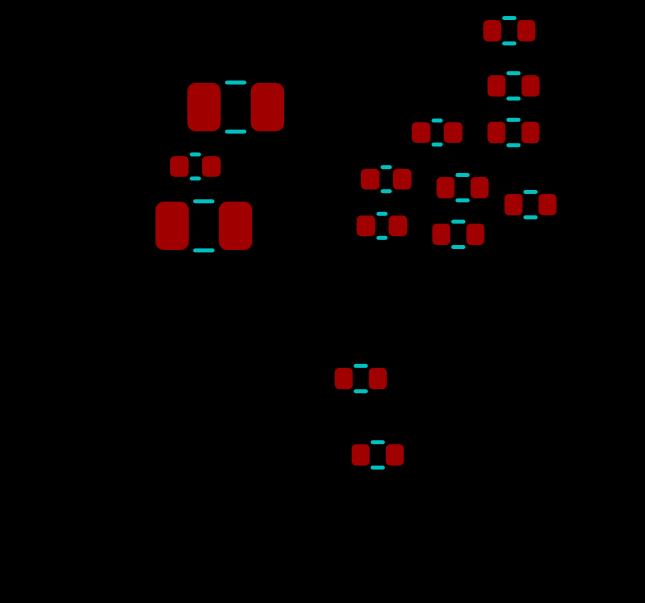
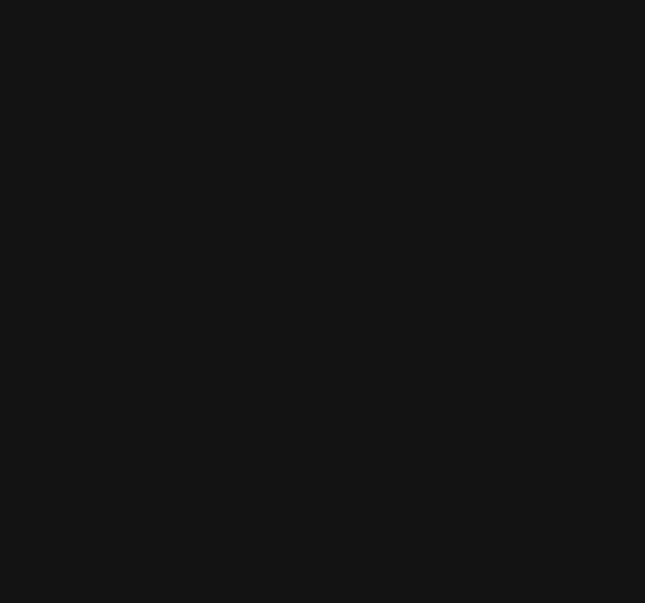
part: (509, 30) -> none
part: (513, 85) -> none
part: (235, 107) -> none
part: (437, 132) -> none
part: (513, 132) -> none
part: (195, 166) -> none
part: (386, 179) -> none
part: (462, 187) -> none
part: (530, 204) -> none
part: (203, 225) -> none
part: (381, 225) -> none
part: (458, 234) -> none
part: (360, 378) -> none
part: (377, 454) -> none

